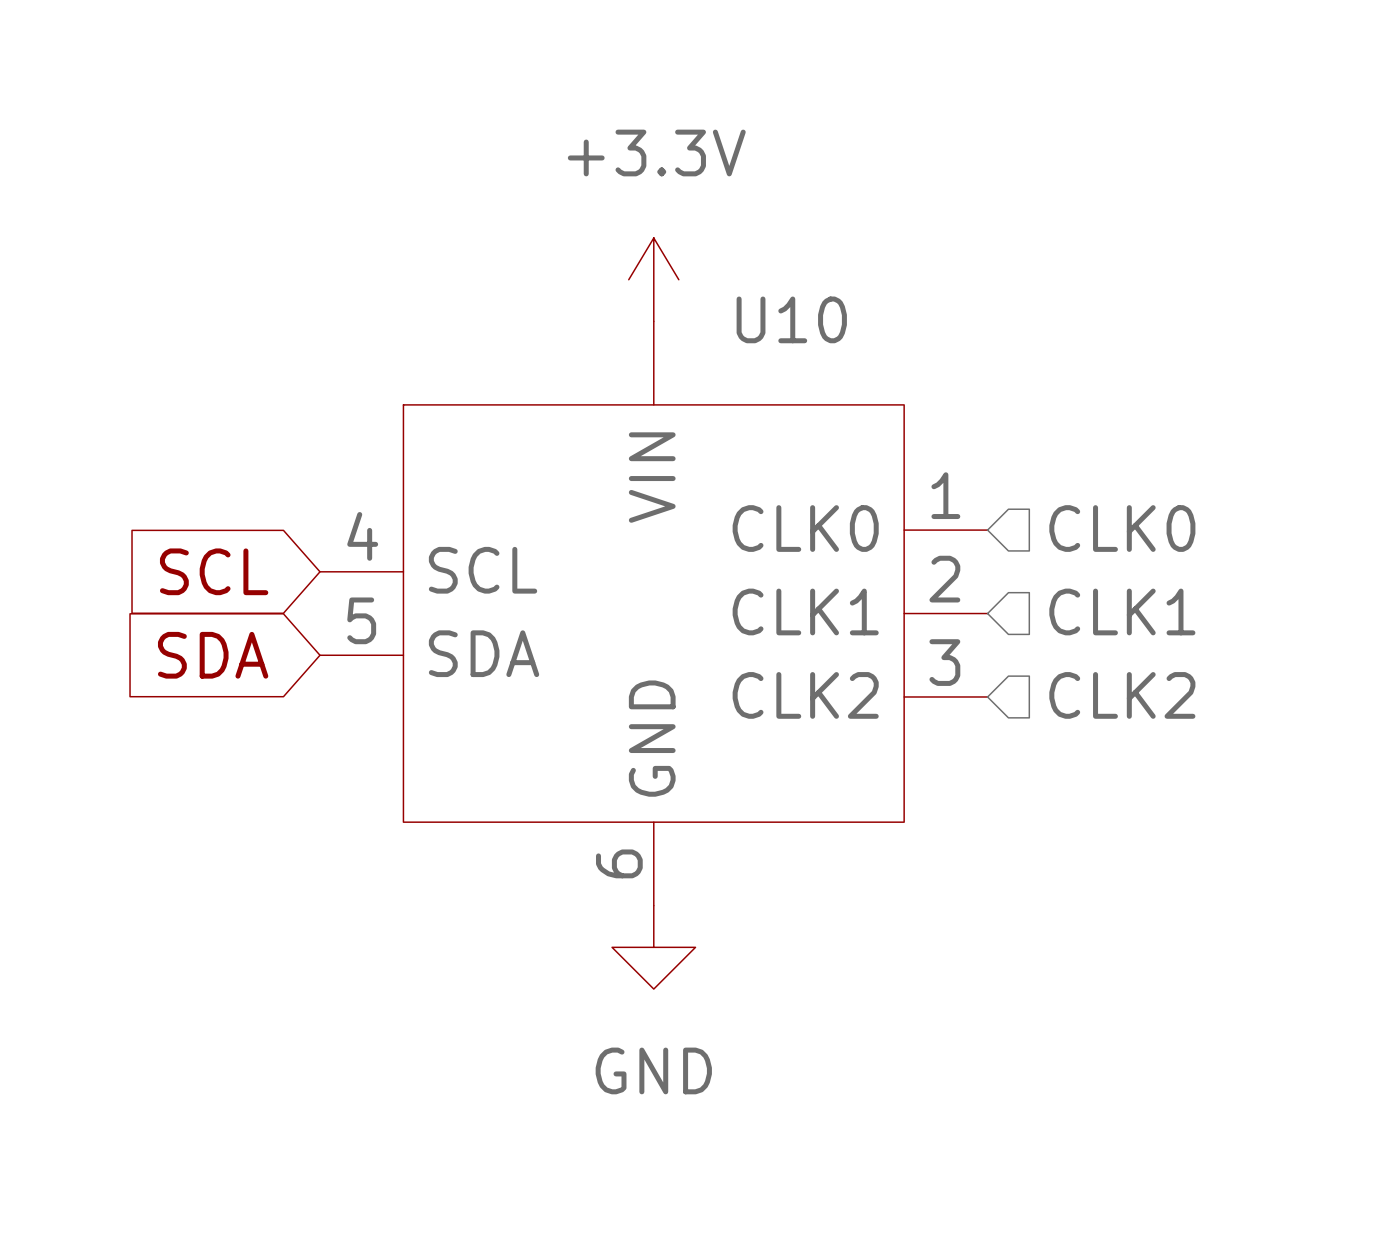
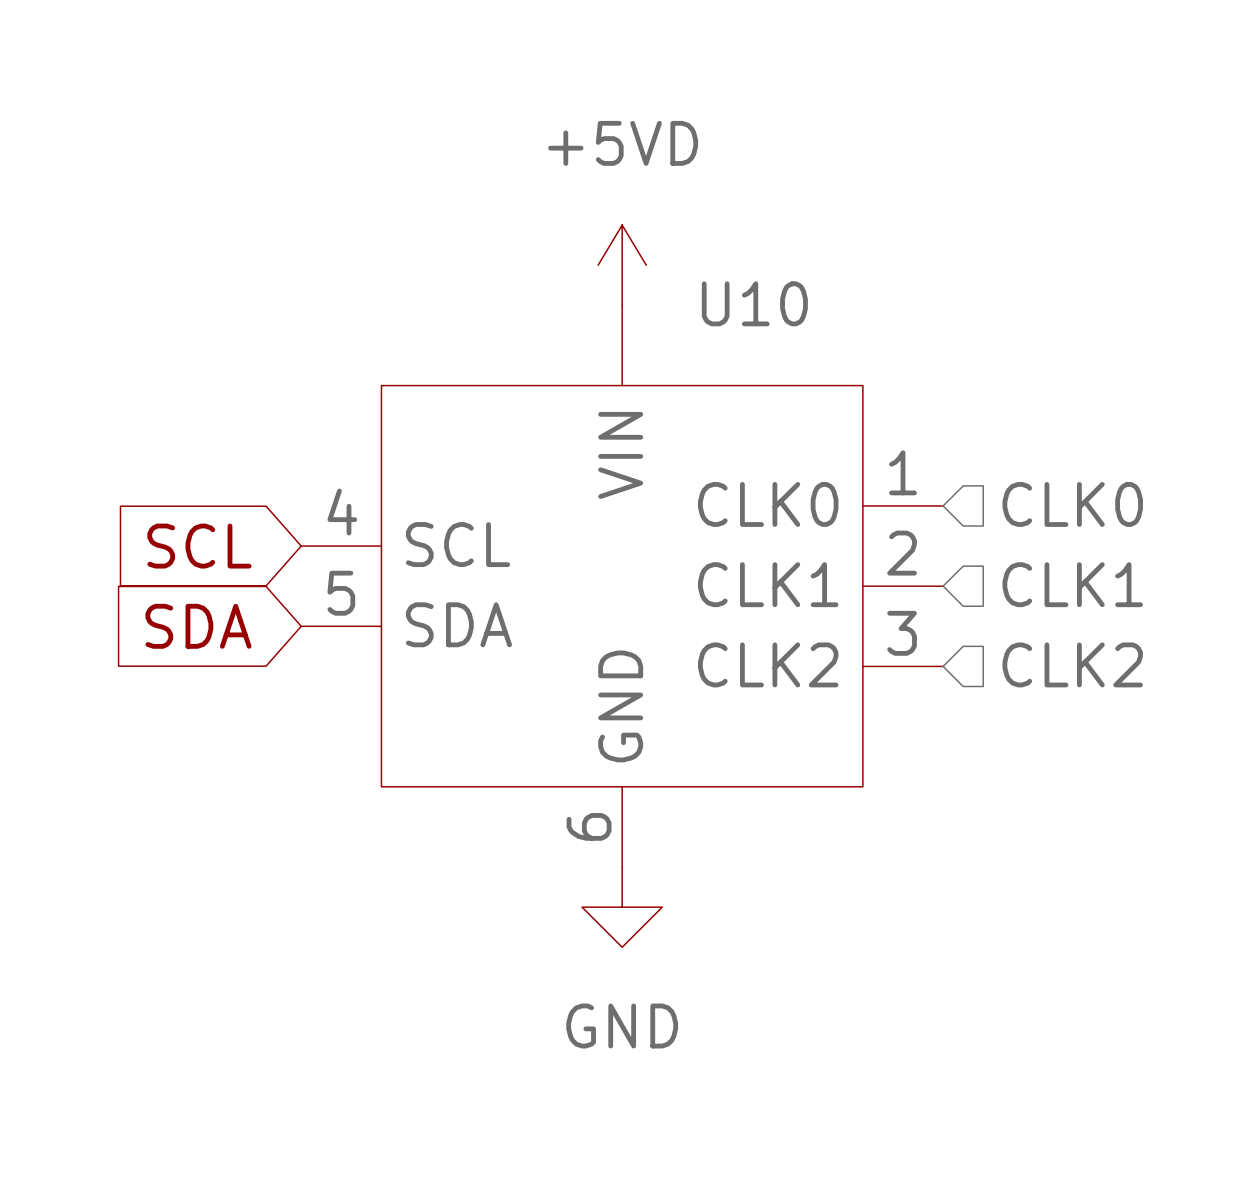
power symbol: +3.3V (653, 279) -> +5VD (622, 265)

